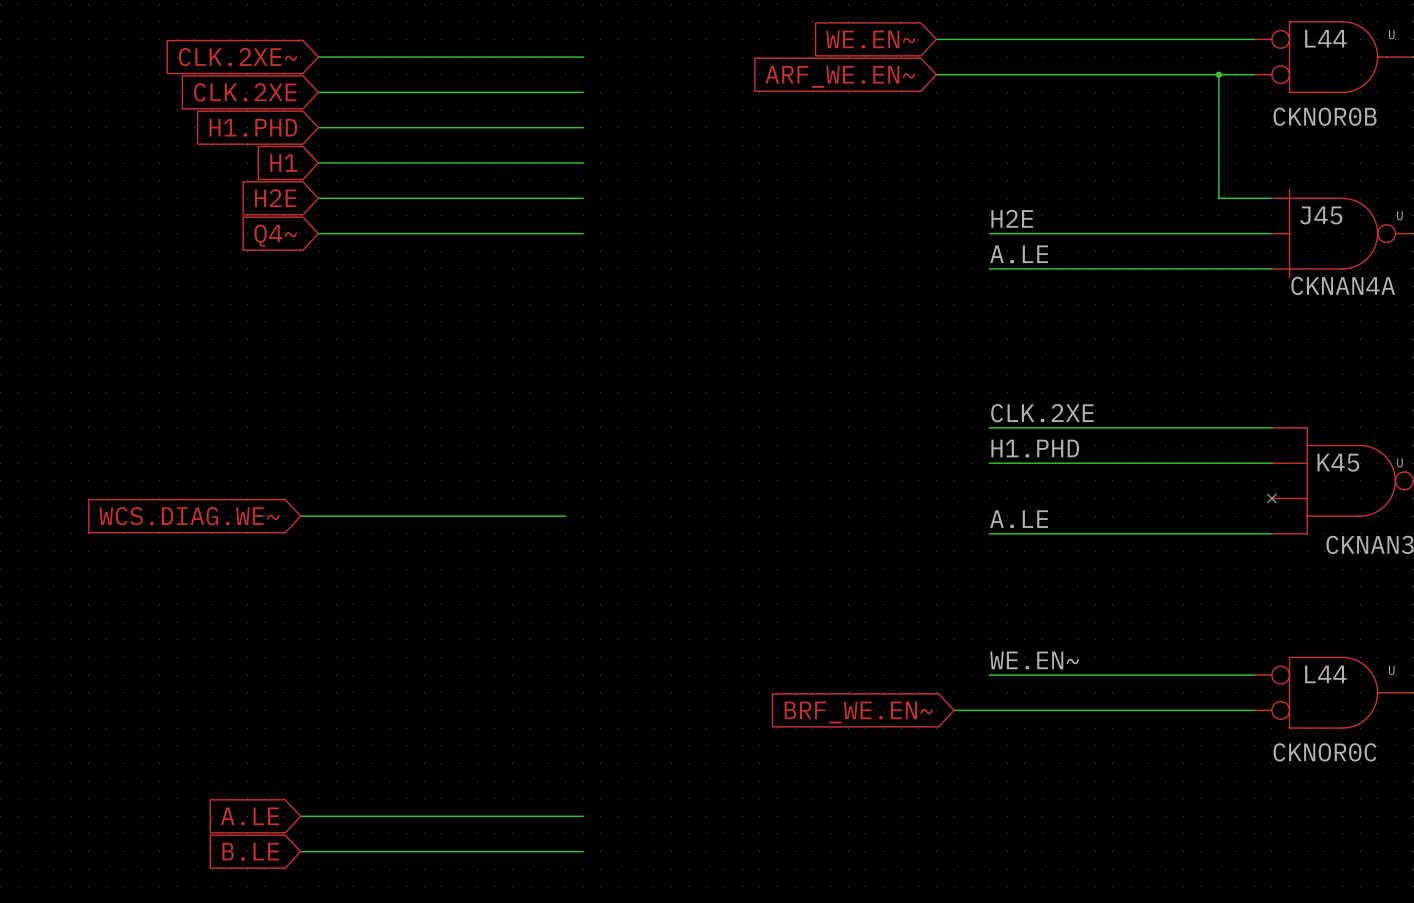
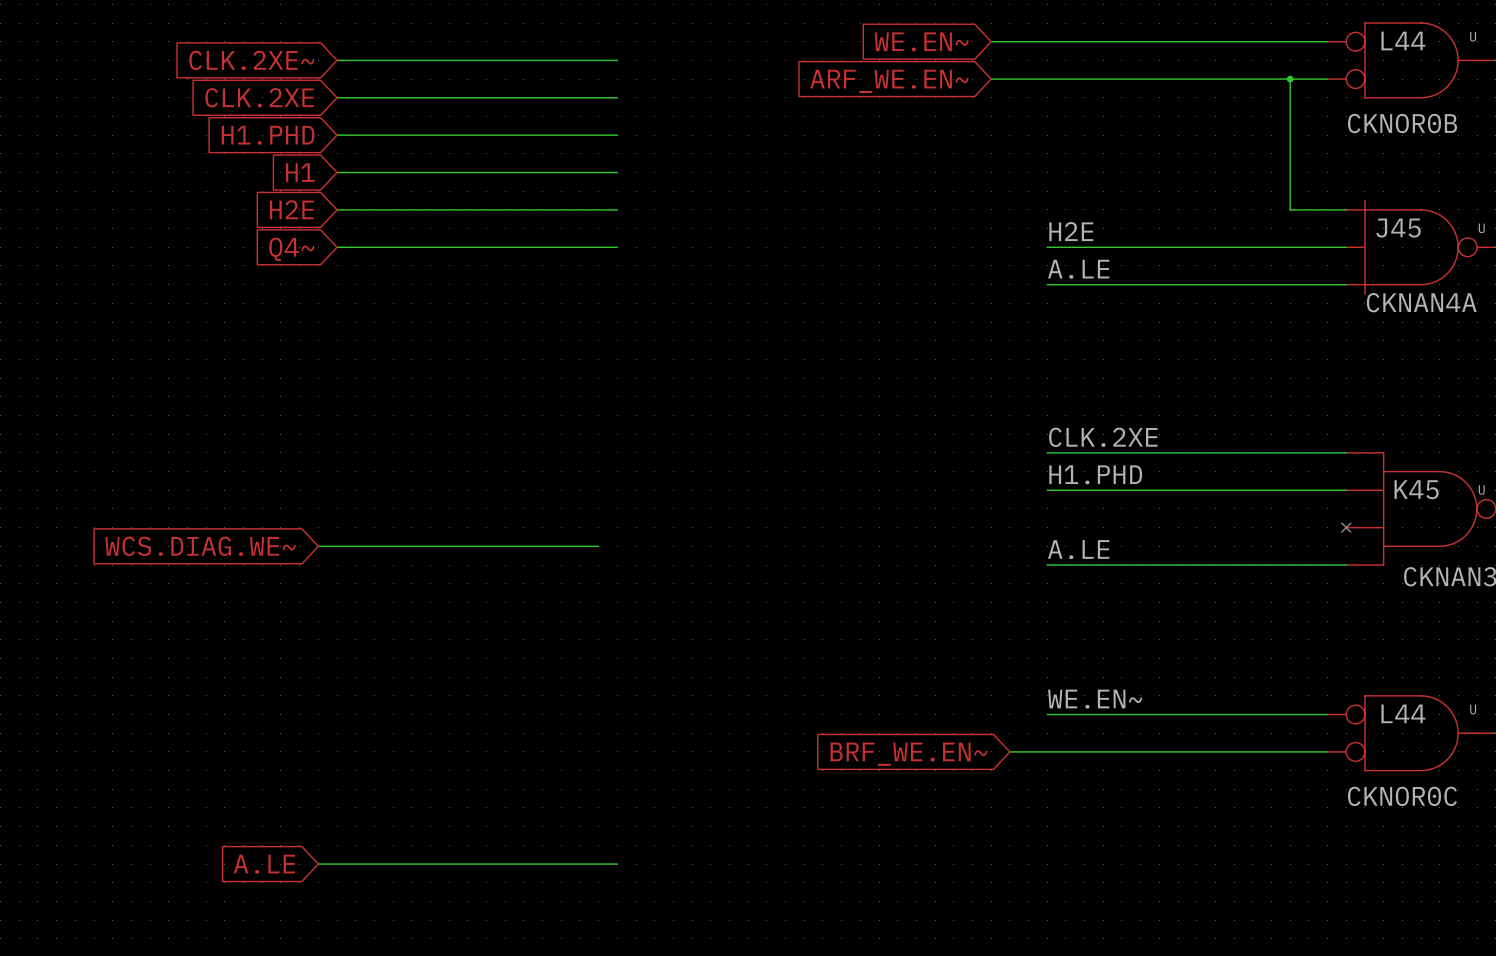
global label: B.LE (250, 851) -> none
wire: (300, 851) (583, 851) -> none

